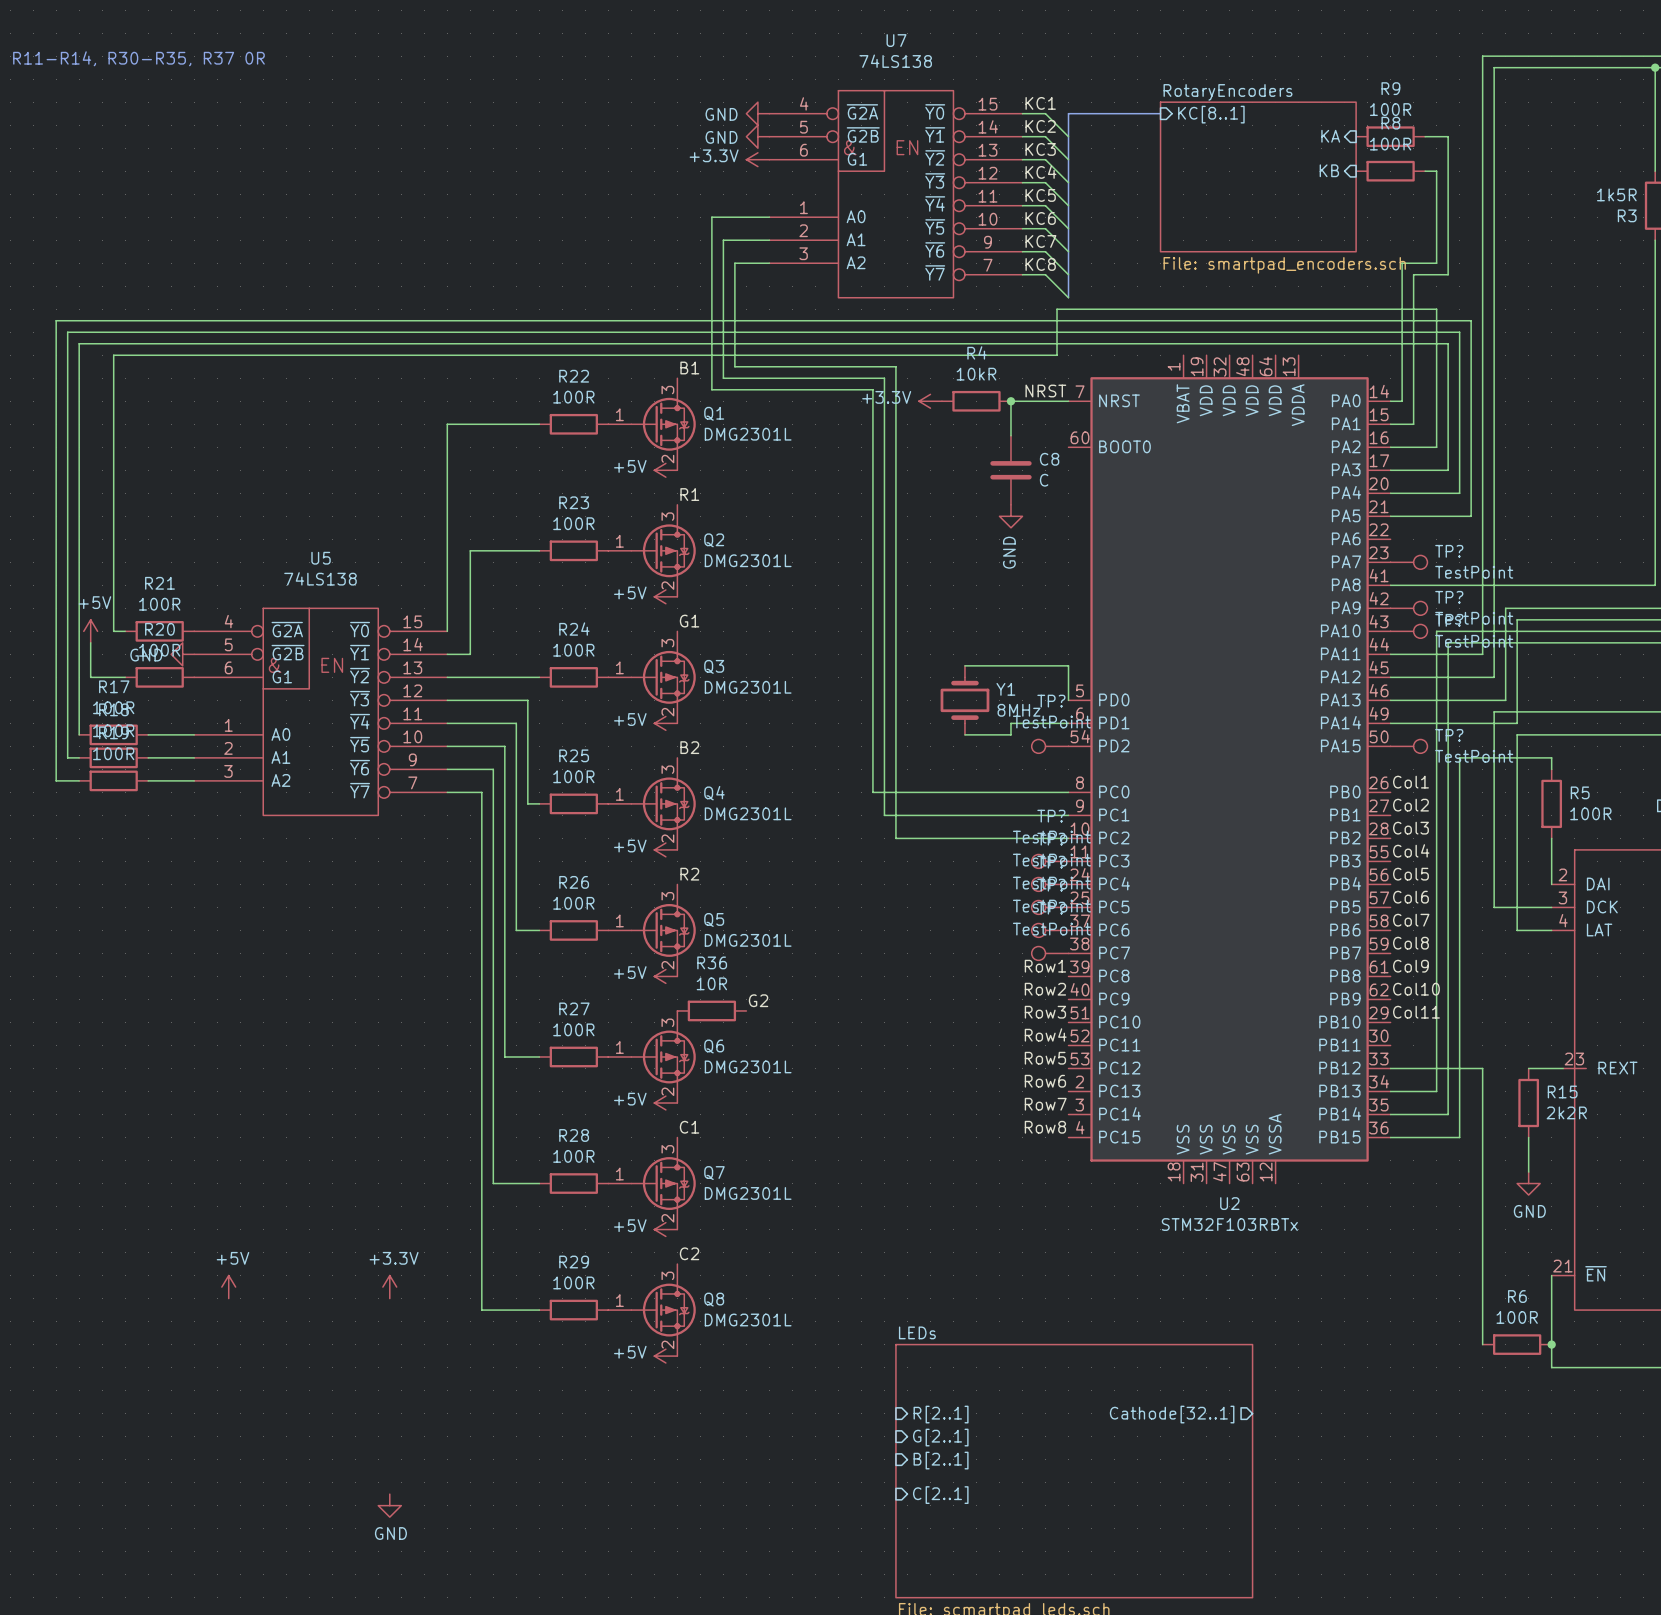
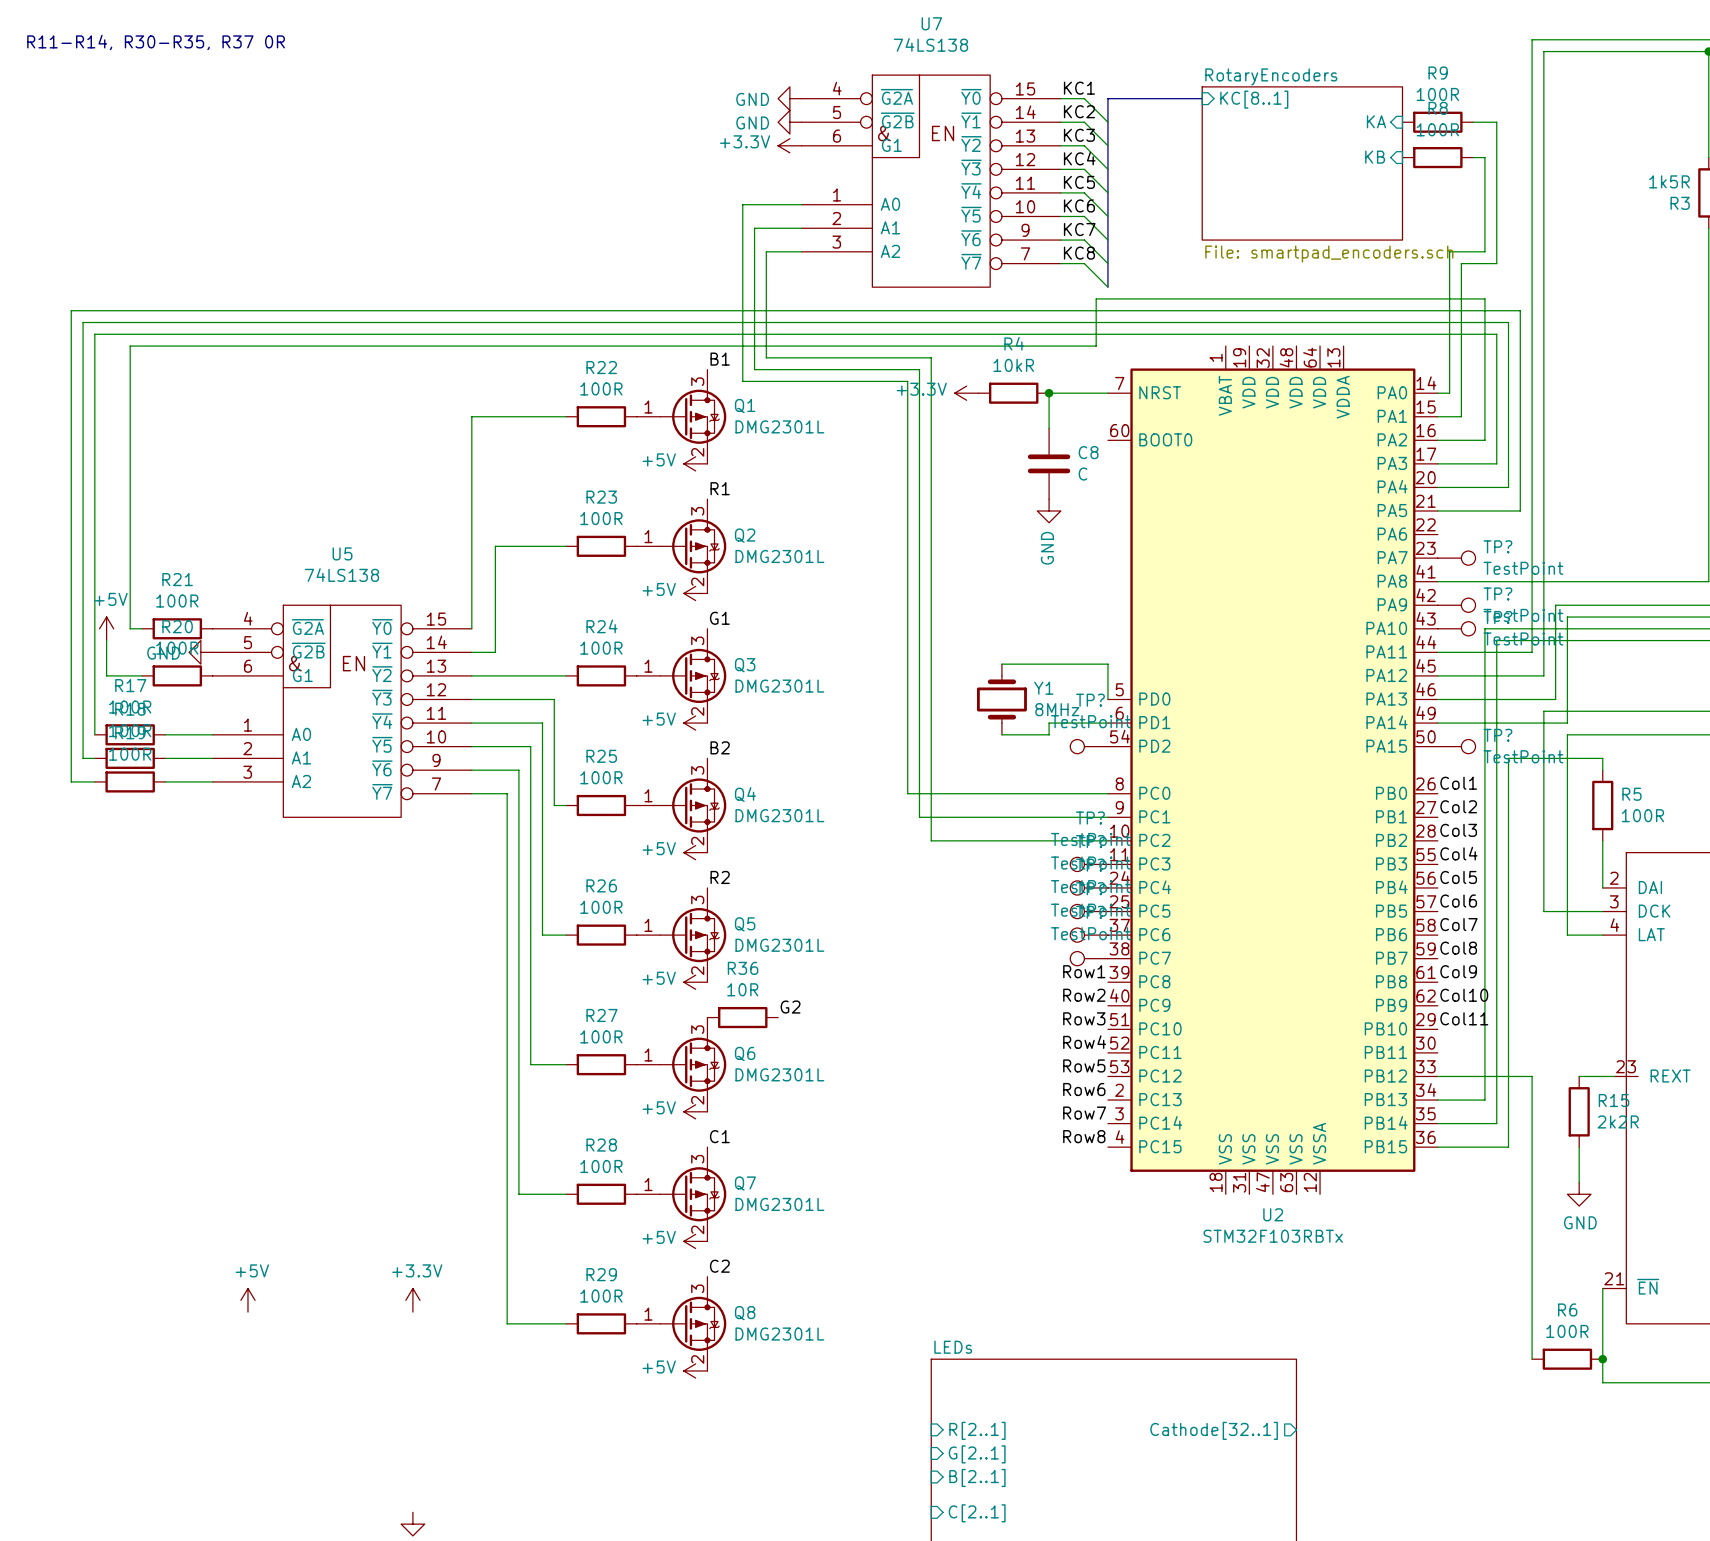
label: NRST (1045, 391) -> none

